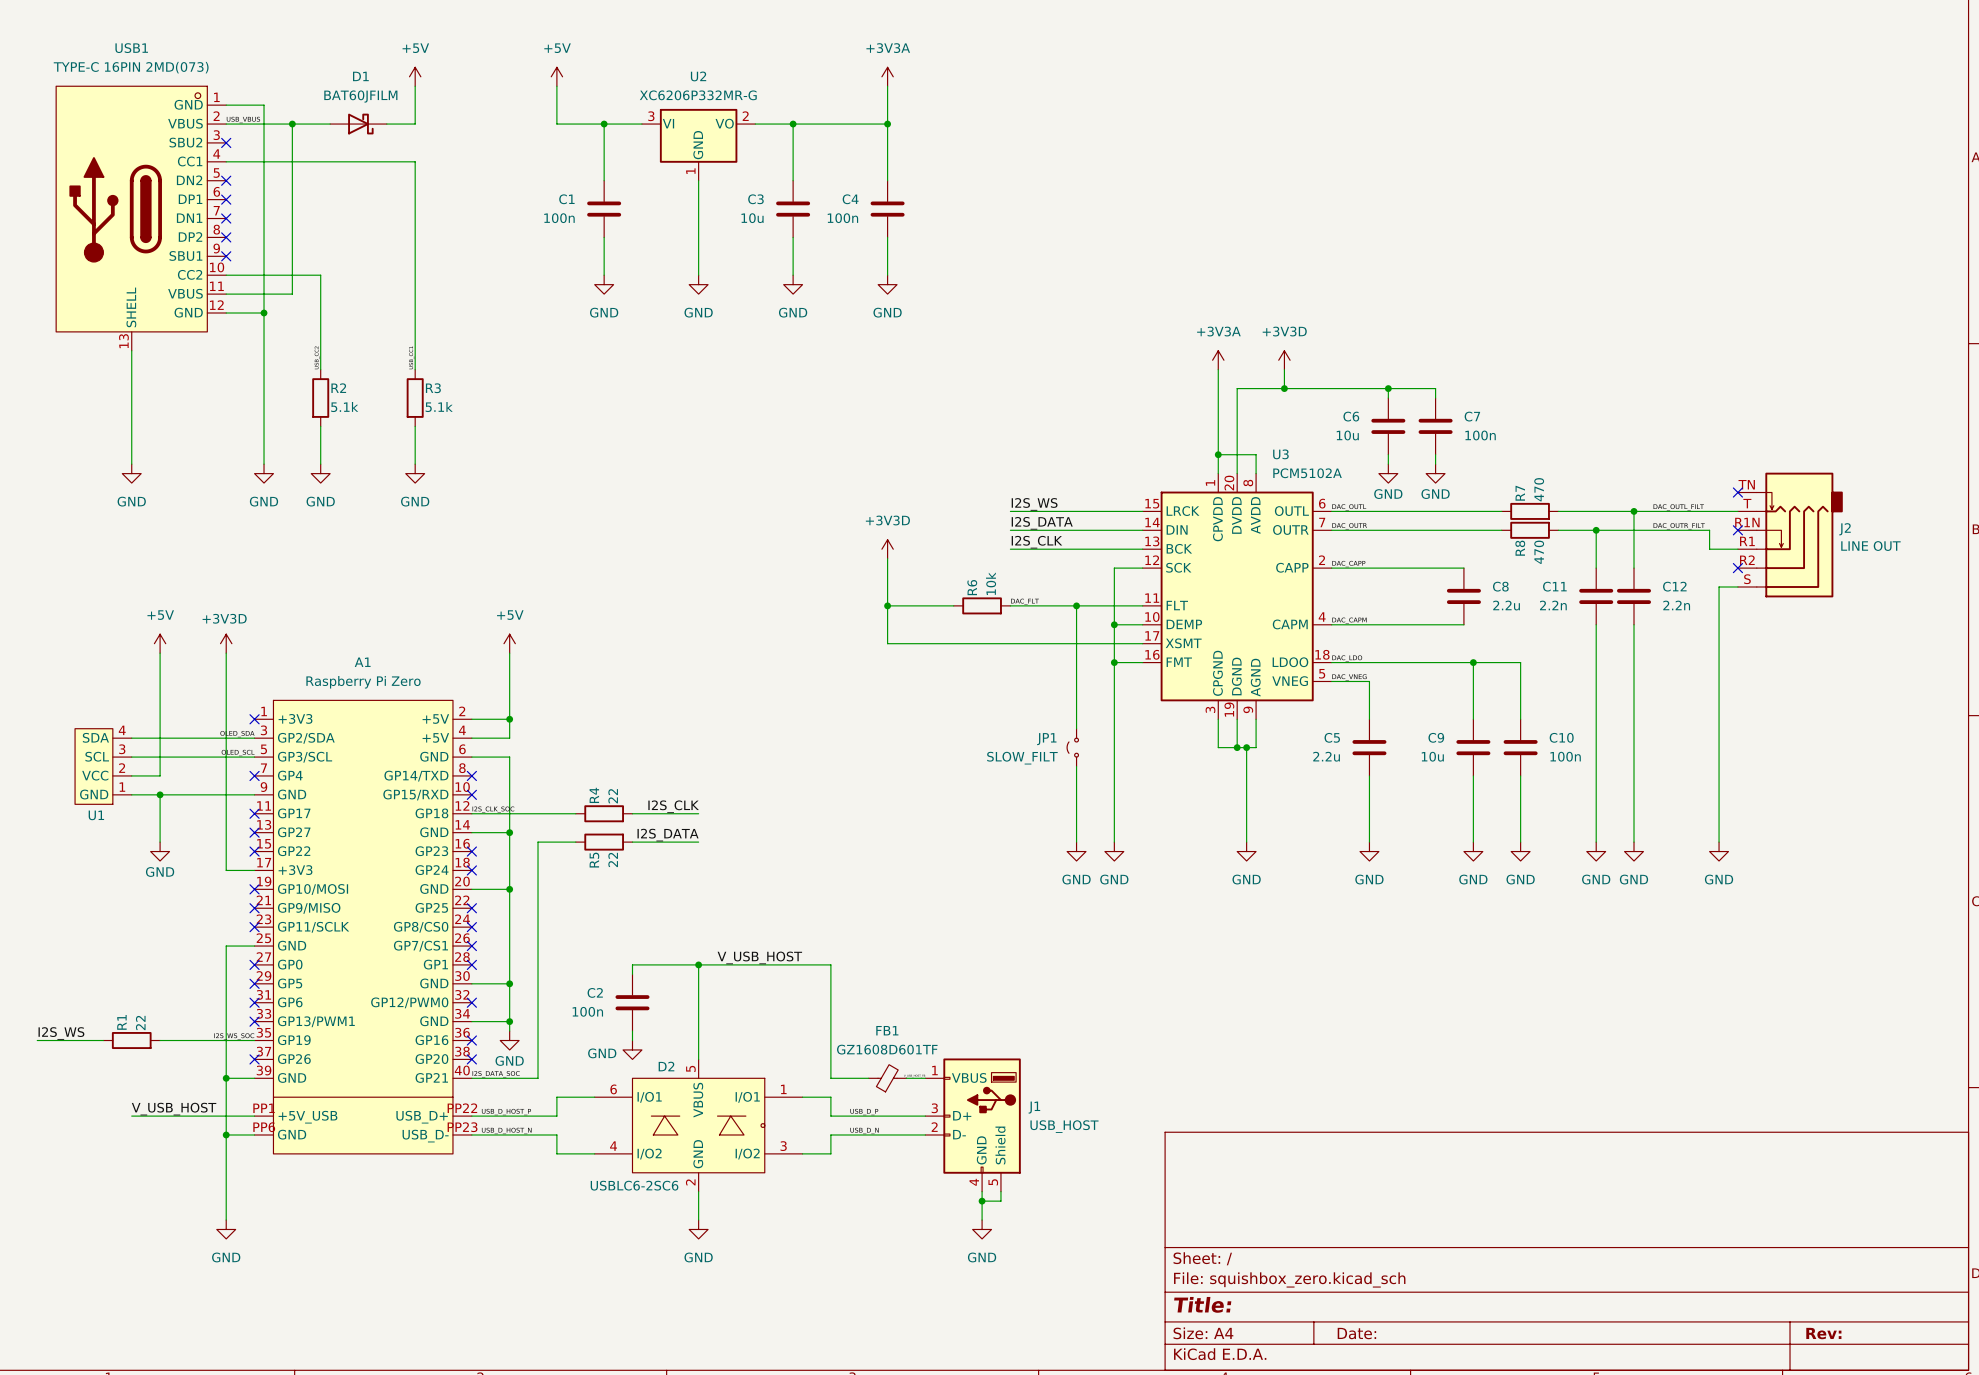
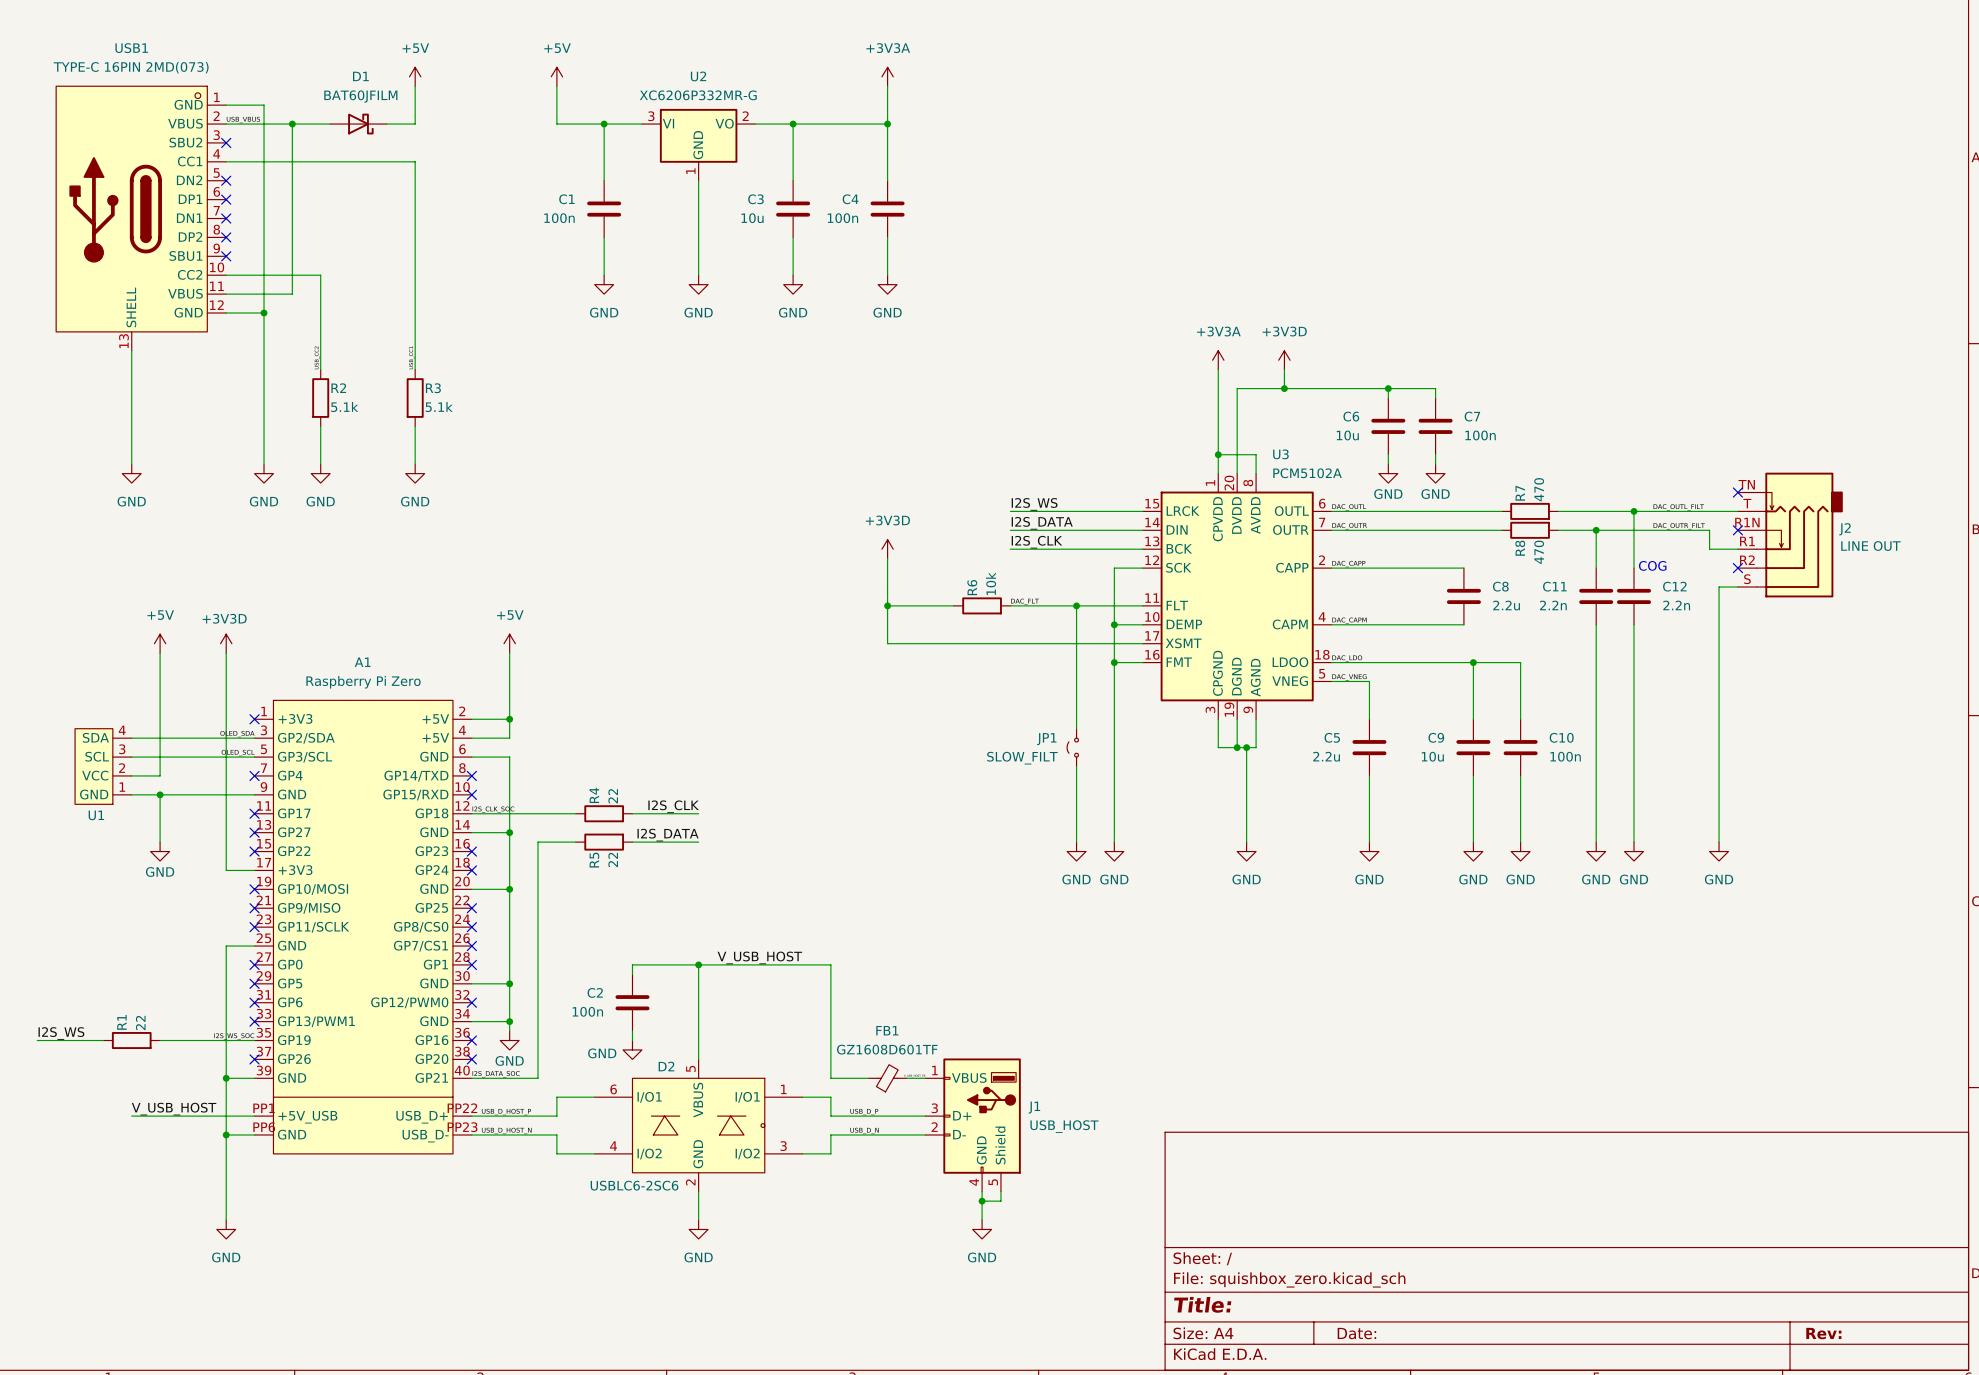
text: none -> COG (1652, 565)

